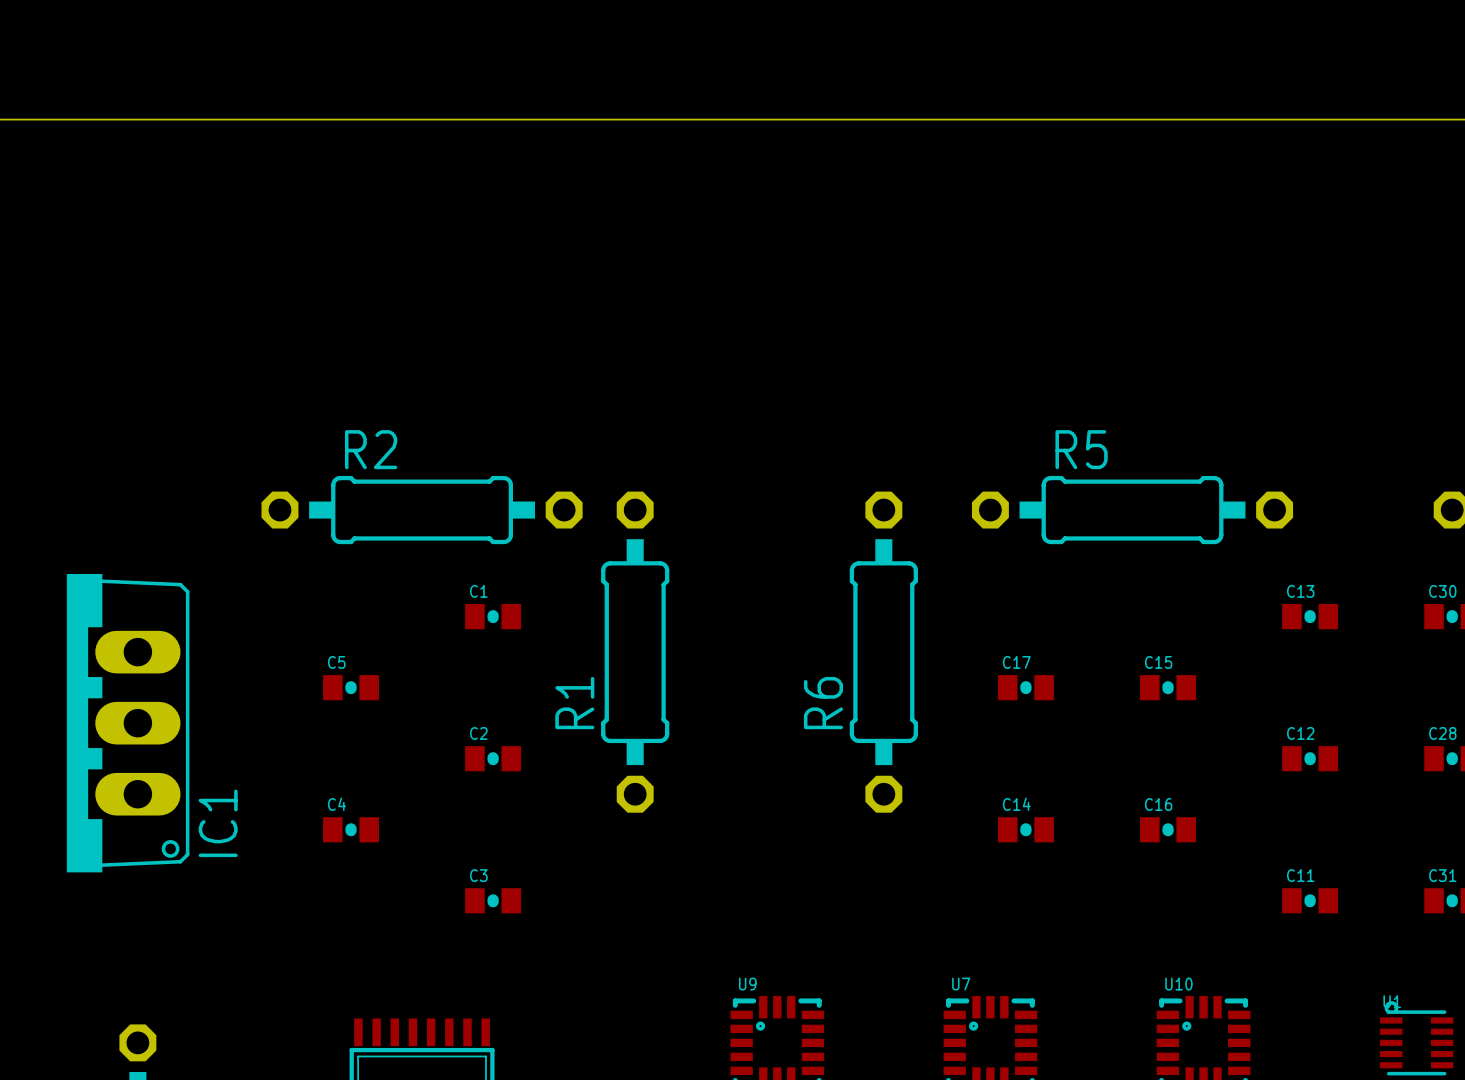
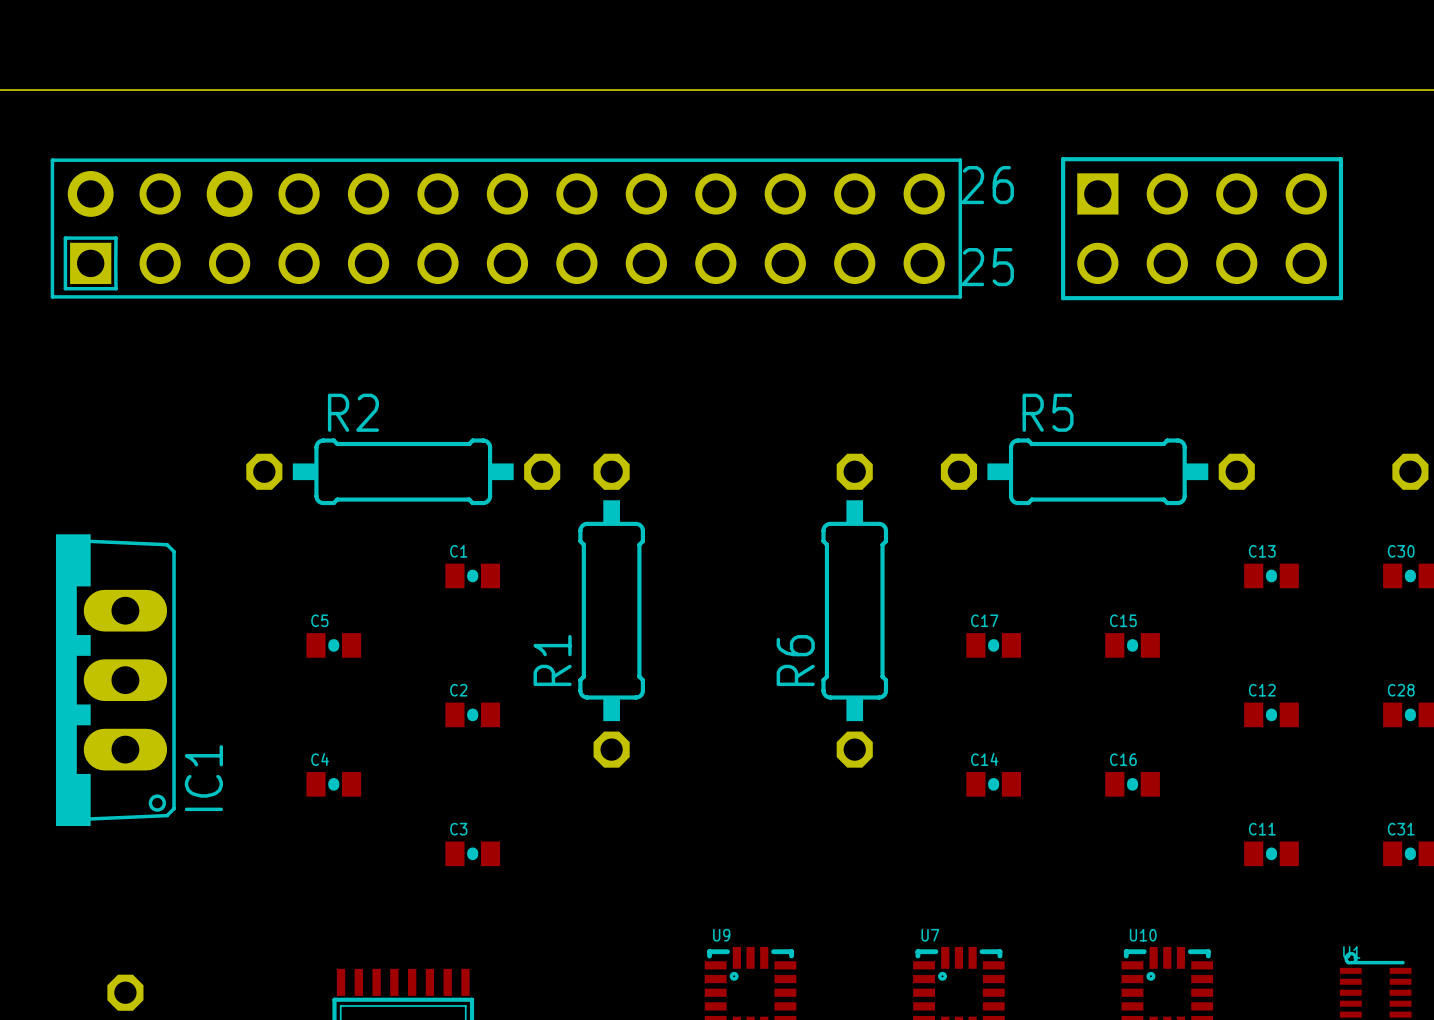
part: none -> (696, 228)

